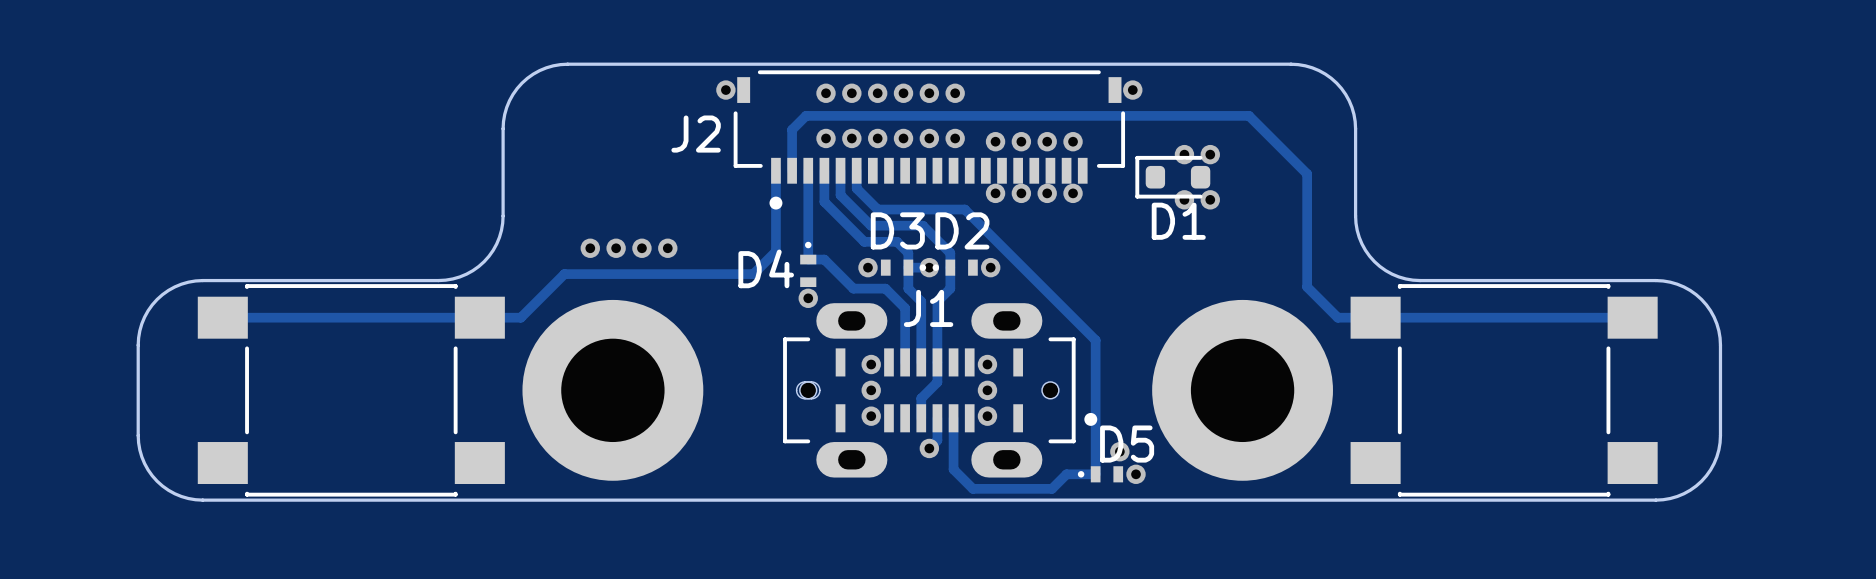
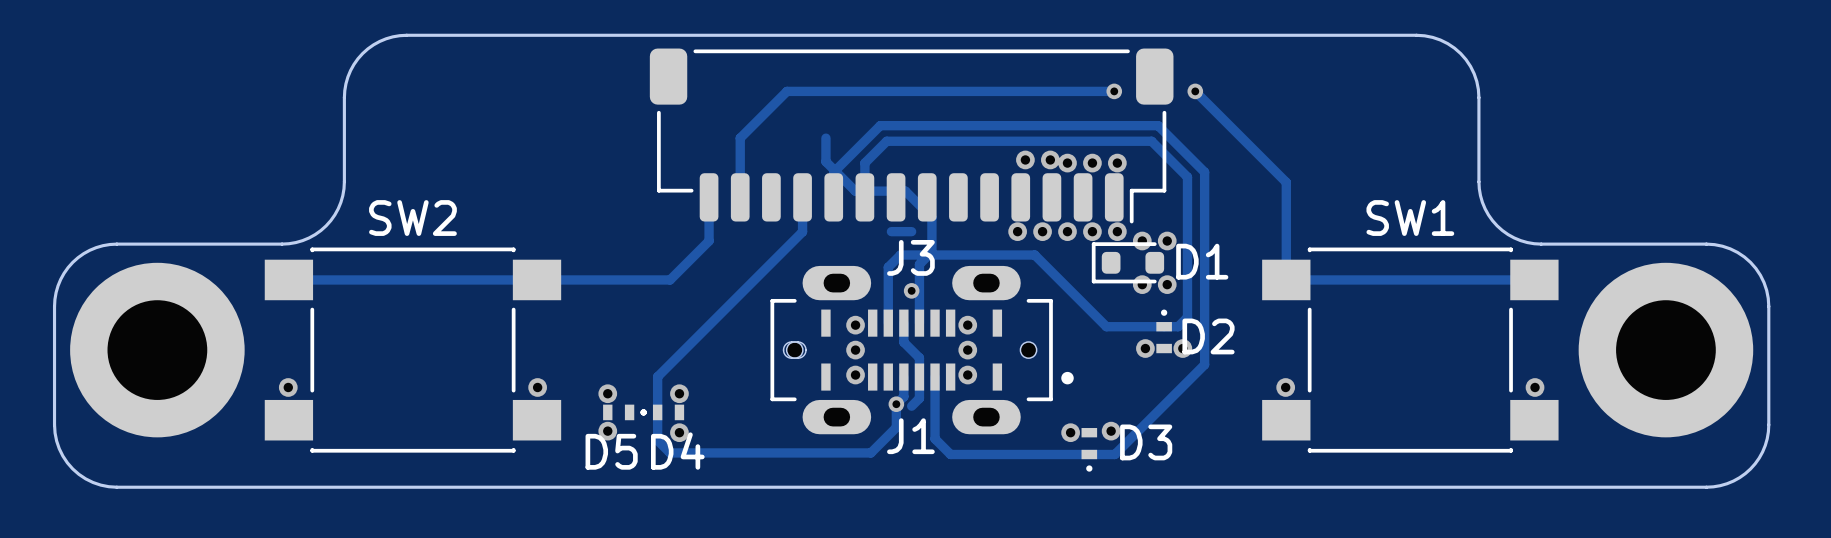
board edge: (567, 64) (546, 67) (533, 74) (522, 83) (509, 100) (503, 121) (501, 230) (493, 250) (478, 266) (466, 274) (445, 280) (277, 280) -> (562, 35) (399, 35) (386, 38) (367, 48) (353, 64) (345, 83) (344, 188) (338, 208) (326, 225) (315, 234) (295, 242) (282, 244)
board edge: (1291, 64) (1312, 67) (1325, 74) (1336, 83) (1349, 100) (1355, 121) (1357, 230) (1365, 250) (1379, 266) (1392, 274) (1412, 280) (1581, 280) -> (1260, 35) (1424, 35) (1440, 40) (1454, 48) (1470, 66) (1478, 89) (1479, 188) (1485, 208) (1497, 225) (1508, 234) (1527, 242) (1541, 244)
via: (725, 90) -> none
via: (1132, 90) -> none
via: (826, 93) -> none
via: (851, 93) -> none
via: (877, 93) -> none
via: (903, 93) -> none
via: (929, 93) -> none
via: (955, 93) -> none
track: none -> (1114, 91) (786, 91) (740, 138) (740, 197)
via: none -> (1114, 91)
via: none -> (1195, 91)
via: (826, 138) -> none
via: (851, 138) -> none
via: (877, 138) -> none
via: (903, 138) -> none
via: (929, 138) -> none
via: (955, 138) -> none
J2: (929, 139) -> none
via: (995, 141) -> none
via: (1021, 141) -> none
via: (1047, 141) -> none
via: (1073, 141) -> none
via: (1184, 154) -> none
via: (1210, 154) -> none
J3: none -> (911, 135)
track: (775, 170) (775, 251) (753, 274) (564, 274) (520, 317) -> (709, 197) (709, 241) (670, 279) (517, 279)
track: (792, 170) (792, 129) (806, 115) (1249, 115) (1307, 174) (1307, 287) (1337, 317) -> (1195, 91) (1286, 182) (1286, 279) (1305, 279)
track: (808, 170) (808, 259) (824, 259) (853, 288) (885, 288) (905, 308) -> (864, 197) (864, 163) (886, 141) (1151, 141) (1187, 177) (1187, 317) (1178, 326) (1106, 326) (1034, 255) (900, 255) (888, 267) (888, 270)
track: (824, 170) (824, 201) (864, 241) (897, 241) (908, 253) (908, 288) (921, 301) (921, 362) -> (919, 377) (919, 357) (903, 342) (903, 323)
track: (856, 170) (856, 188) (877, 209) (964, 209) (1095, 340) (1095, 474) (1066, 474) (1052, 488) (972, 488) (953, 469) -> (833, 197) (833, 172) (880, 125) (1158, 125) (1204, 172) (1204, 364) (1114, 454) (950, 454) (935, 438) (935, 426)
D1 position: (1172, 177) -> (1127, 262)
via: (995, 193) -> none
via: (1021, 193) -> none
via: none -> (1067, 163)
via: none -> (1092, 163)
via: none -> (1117, 163)
via: (1184, 199) -> none
via: (1210, 199) -> none
D1 name position: D1 (1178, 221) -> D1 (1202, 261)
via: (590, 248) -> none
via: (616, 248) -> none
via: (641, 248) -> none
via: (667, 248) -> none
D4 rotation: 0° (808, 264) -> 90° counterclockwise (662, 412)
D4 position: (808, 264) -> (662, 412)
via: (867, 267) -> none
D3 rotation: 0° (903, 267) -> 90° clockwise (1089, 449)
D3 position: (903, 267) -> (1089, 449)
via: (929, 267) -> none
D2 rotation: 0° (955, 267) -> 90° clockwise (1164, 331)
D2 position: (955, 267) -> (1164, 331)
via: (990, 267) -> none
via: none -> (1017, 231)
via: none -> (1042, 231)
via: none -> (1067, 231)
via: none -> (1092, 231)
via: none -> (1117, 231)
via: none -> (1142, 241)
via: none -> (1167, 241)
board edge: (202, 280) (181, 284) (168, 290) (157, 299) (144, 317) (139, 330) (138, 345) (138, 435) (139, 449) (144, 463) (152, 475) (168, 490) (181, 496) (202, 500) (1663, 499) (1677, 496) (1696, 486) (1710, 469) (1716, 456) (1720, 435) (1720, 345) (1718, 330) (1714, 317) (1701, 299) (1683, 286) (1670, 282) (1655, 280) -> (210, 244) (102, 245) (89, 250) (77, 257) (68, 267) (60, 279) (56, 292) (54, 306) (55, 433) (62, 456) (72, 468) (85, 478) (100, 485) (116, 487) (1706, 487) (1720, 485) (1733, 481) (1745, 473) (1759, 458) (1765, 445) (1768, 431) (1768, 306) (1766, 290) (1760, 275) (1744, 257) (1722, 246) (1706, 244) (1612, 244)
via: (808, 298) -> none
J1 name position: J1 (928, 308) -> J1 (910, 436)
track: (222, 317) (284, 317) -> none
track: (1574, 317) (1632, 317) -> none
via: none -> (1142, 284)
via: none -> (1167, 284)
via: none -> (911, 290)
track: (937, 362) (937, 382) (921, 398) (921, 418) -> (802, 197) (802, 231) (657, 376) (657, 440) (670, 452) (870, 452) (896, 427) (896, 404) (903, 396) (903, 377)
via: none -> (1145, 348)
via: none -> (1182, 348)
part: (351, 390) -> none
SW2: none -> (412, 350)
part position: (612, 390) -> (157, 350)
part position: (1242, 390) -> (1665, 350)
SW1: none -> (1410, 350)
part: (1504, 390) -> none
via: none -> (288, 387)
via: none -> (537, 387)
via: none -> (1285, 387)
via: none -> (1535, 387)
via: none -> (607, 393)
via: none -> (679, 393)
via position: (929, 448) -> (896, 404)
via position: (1119, 451) -> (1070, 432)
via: none -> (607, 431)
D5 rotation: 0° (1100, 474) -> 180° (624, 412)
D5 position: (1100, 474) -> (624, 412)
via: none -> (679, 432)

